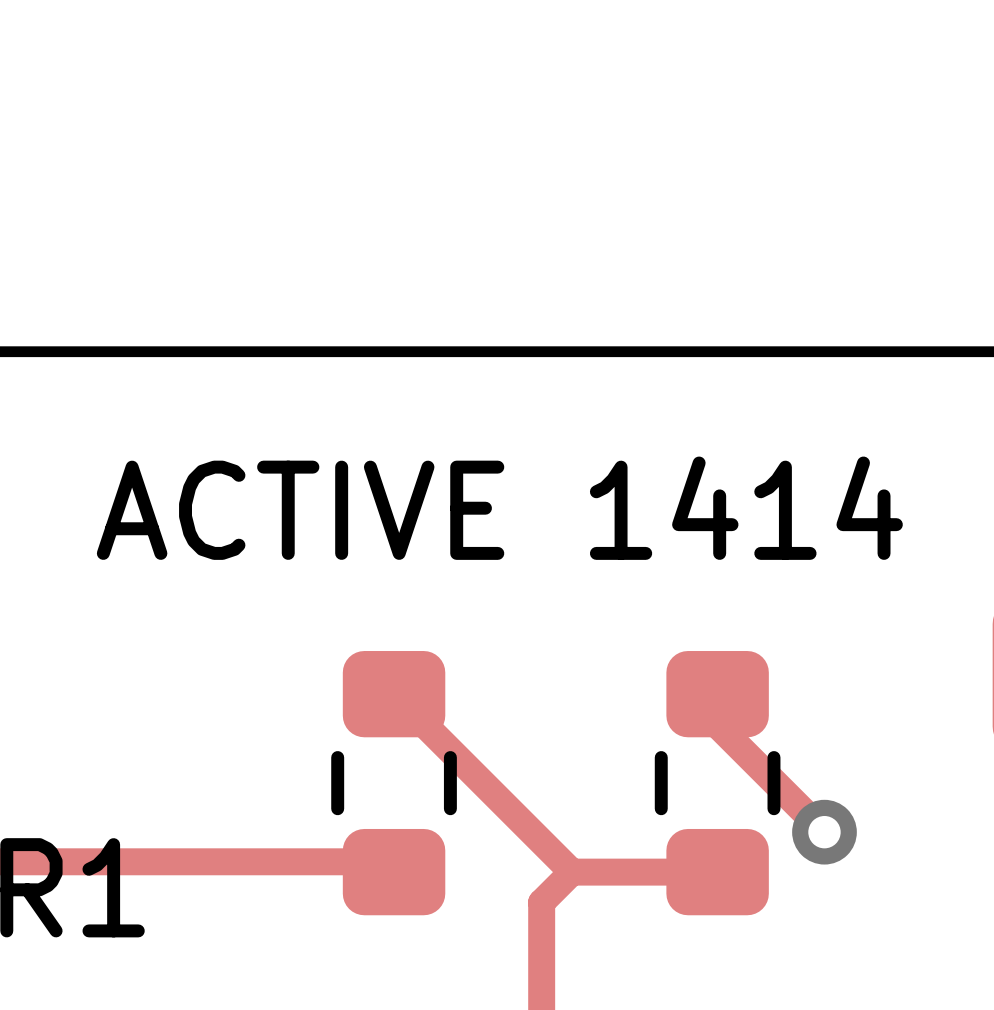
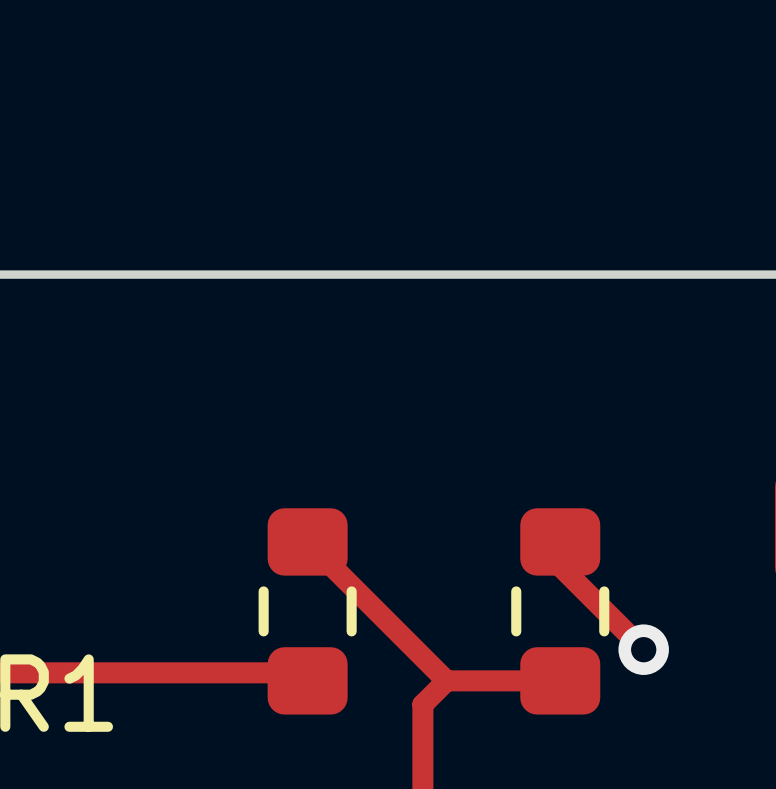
text: ACTIVE 1414 (499, 508) -> none

